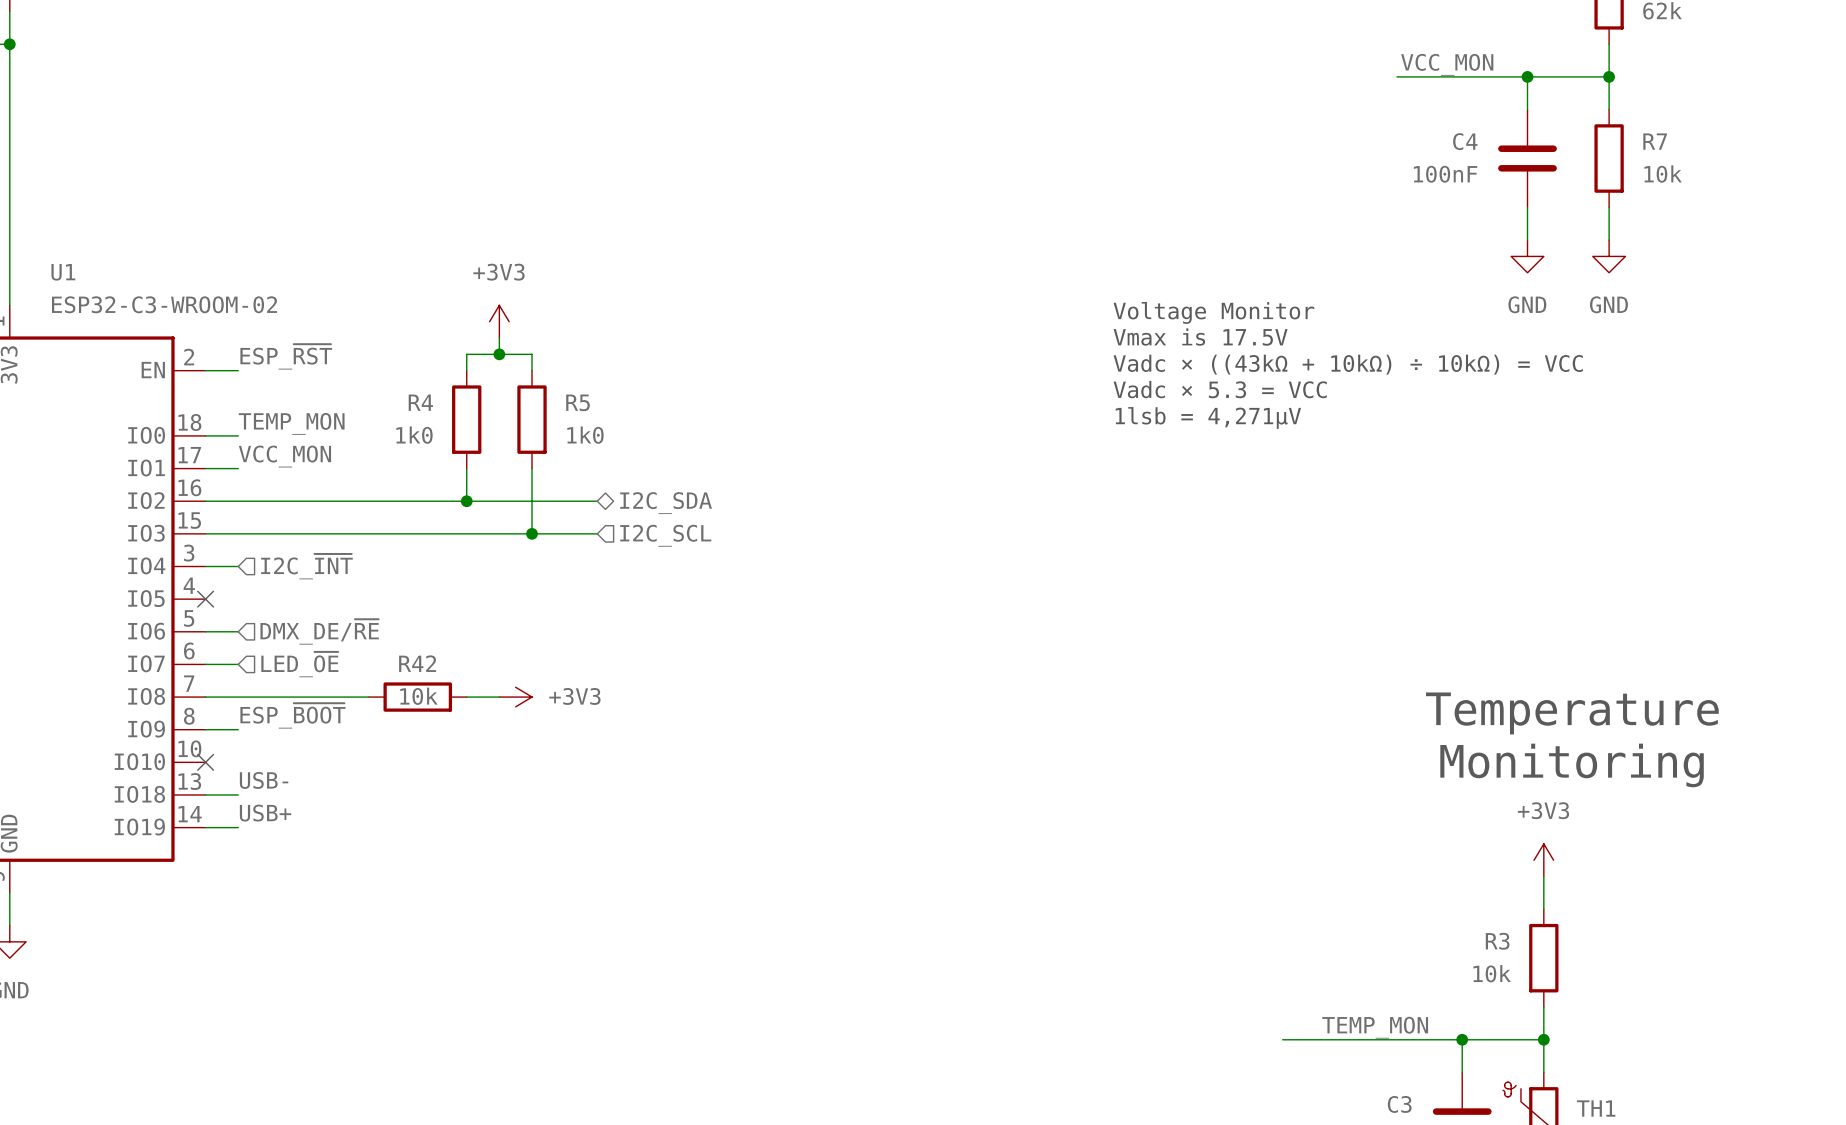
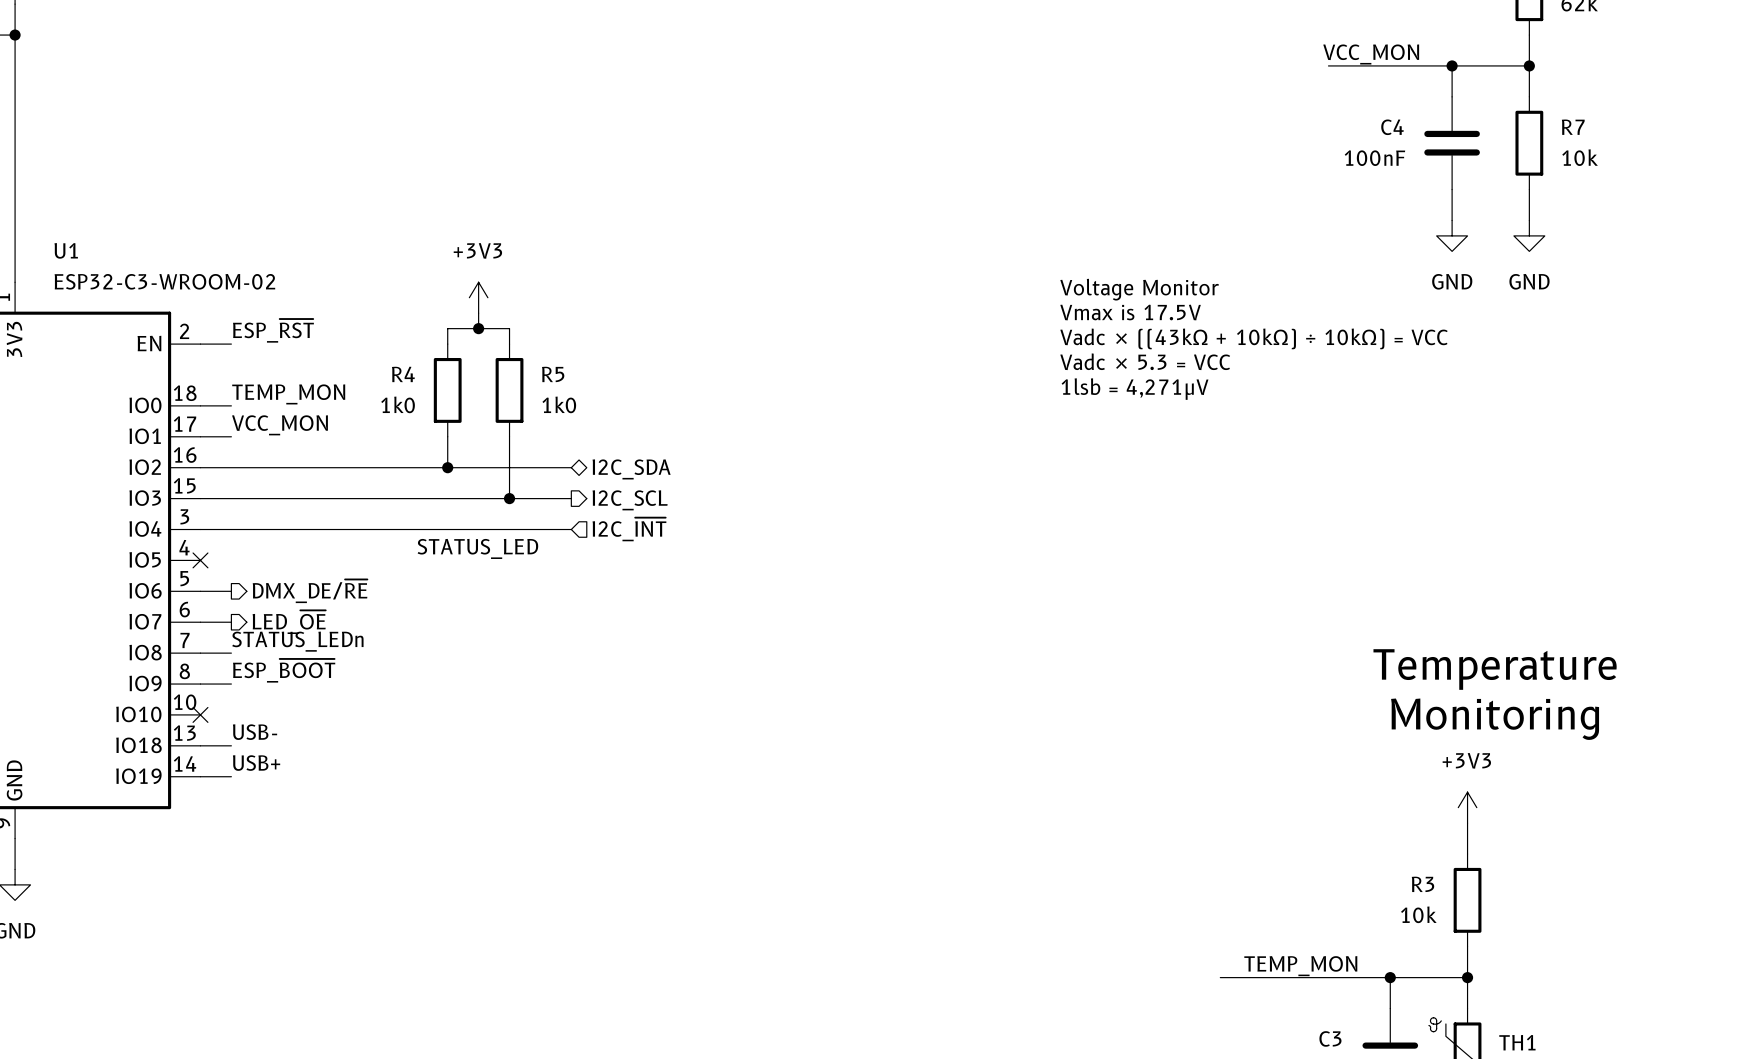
hierarchical label shape: input (665, 535) -> output (630, 500)
wire: none -> (231, 529) (571, 529)
hierarchical label: I2C_~{INT} (306, 566) -> none
hierarchical label: none -> I2C_~{INT} (629, 529)
label: none -> STATUS_LED (477, 548)
hierarchical label shape: input (319, 631) -> output (310, 591)
hierarchical label shape: input (299, 664) -> output (289, 622)
label: none -> STATUS_LEDn (297, 641)
wire: (238, 697) (368, 697) -> none
R42: 10k (417, 697) -> none
wire: (466, 697) (499, 697) -> none
power symbol: +3V3 (515, 697) -> none

